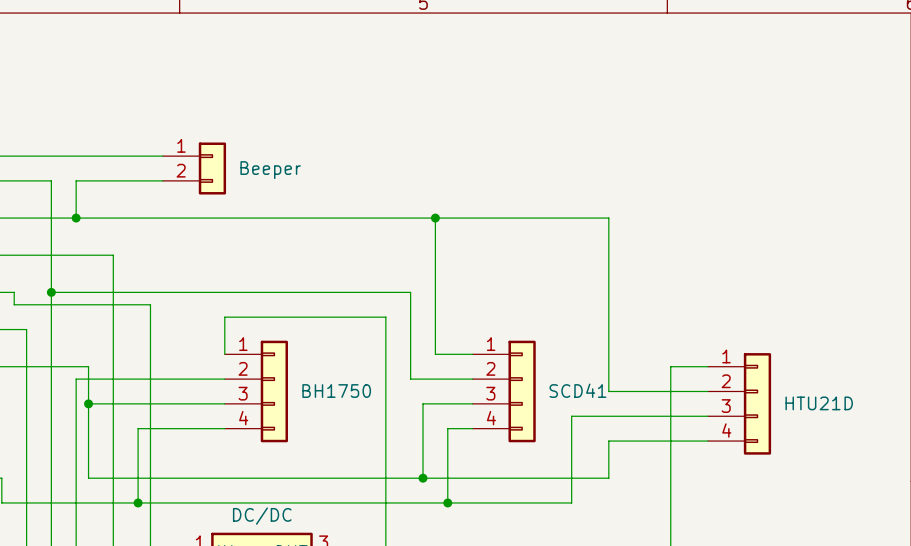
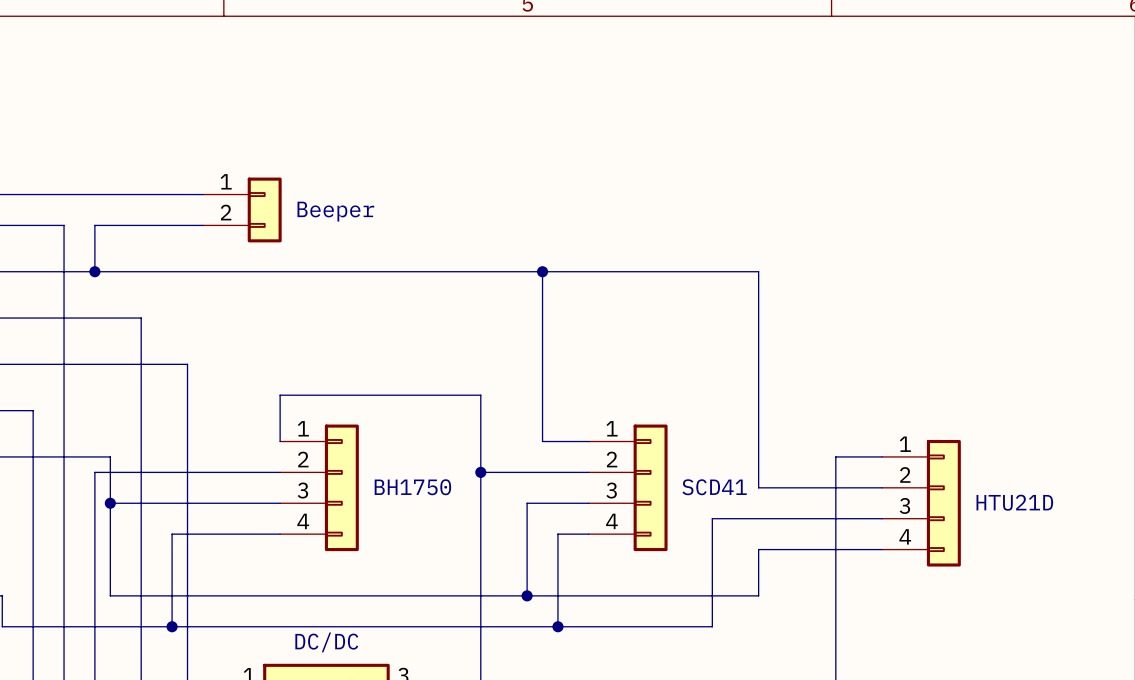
wire: (14, 292) (14, 304) (150, 304) -> (17, 364) (64, 364)
junction: (51, 292) -> none
wire: (150, 292) (410, 292) (410, 379) -> (480, 472) (511, 472)
wire: none -> (187, 364) (187, 379)
junction: none -> (480, 472)

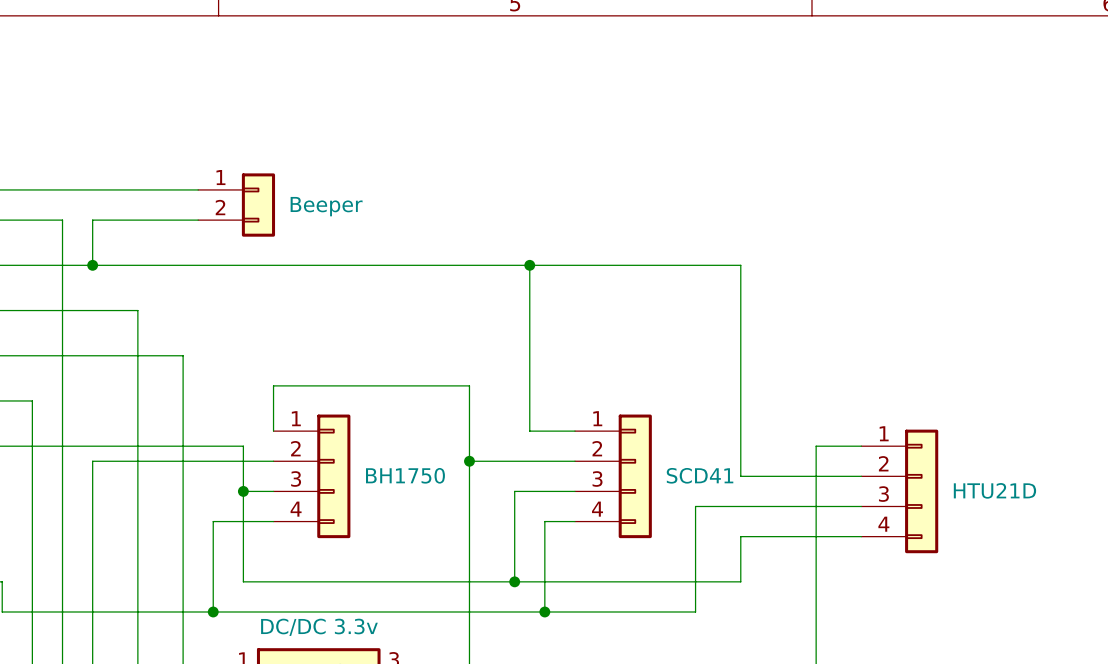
wire: (110, 456) (110, 595) (249, 595) -> (107, 446) (243, 446) (243, 581)
wire: (110, 503) (249, 503) -> none
junction: (110, 503) -> none
junction: none -> (243, 491)
wire: (218, 534) (172, 534) (172, 626) -> (213, 521) (213, 611)
junction position: (172, 626) -> (213, 611)
part value: DC/DC (326, 642) -> DC/DC 3.3v (319, 627)

